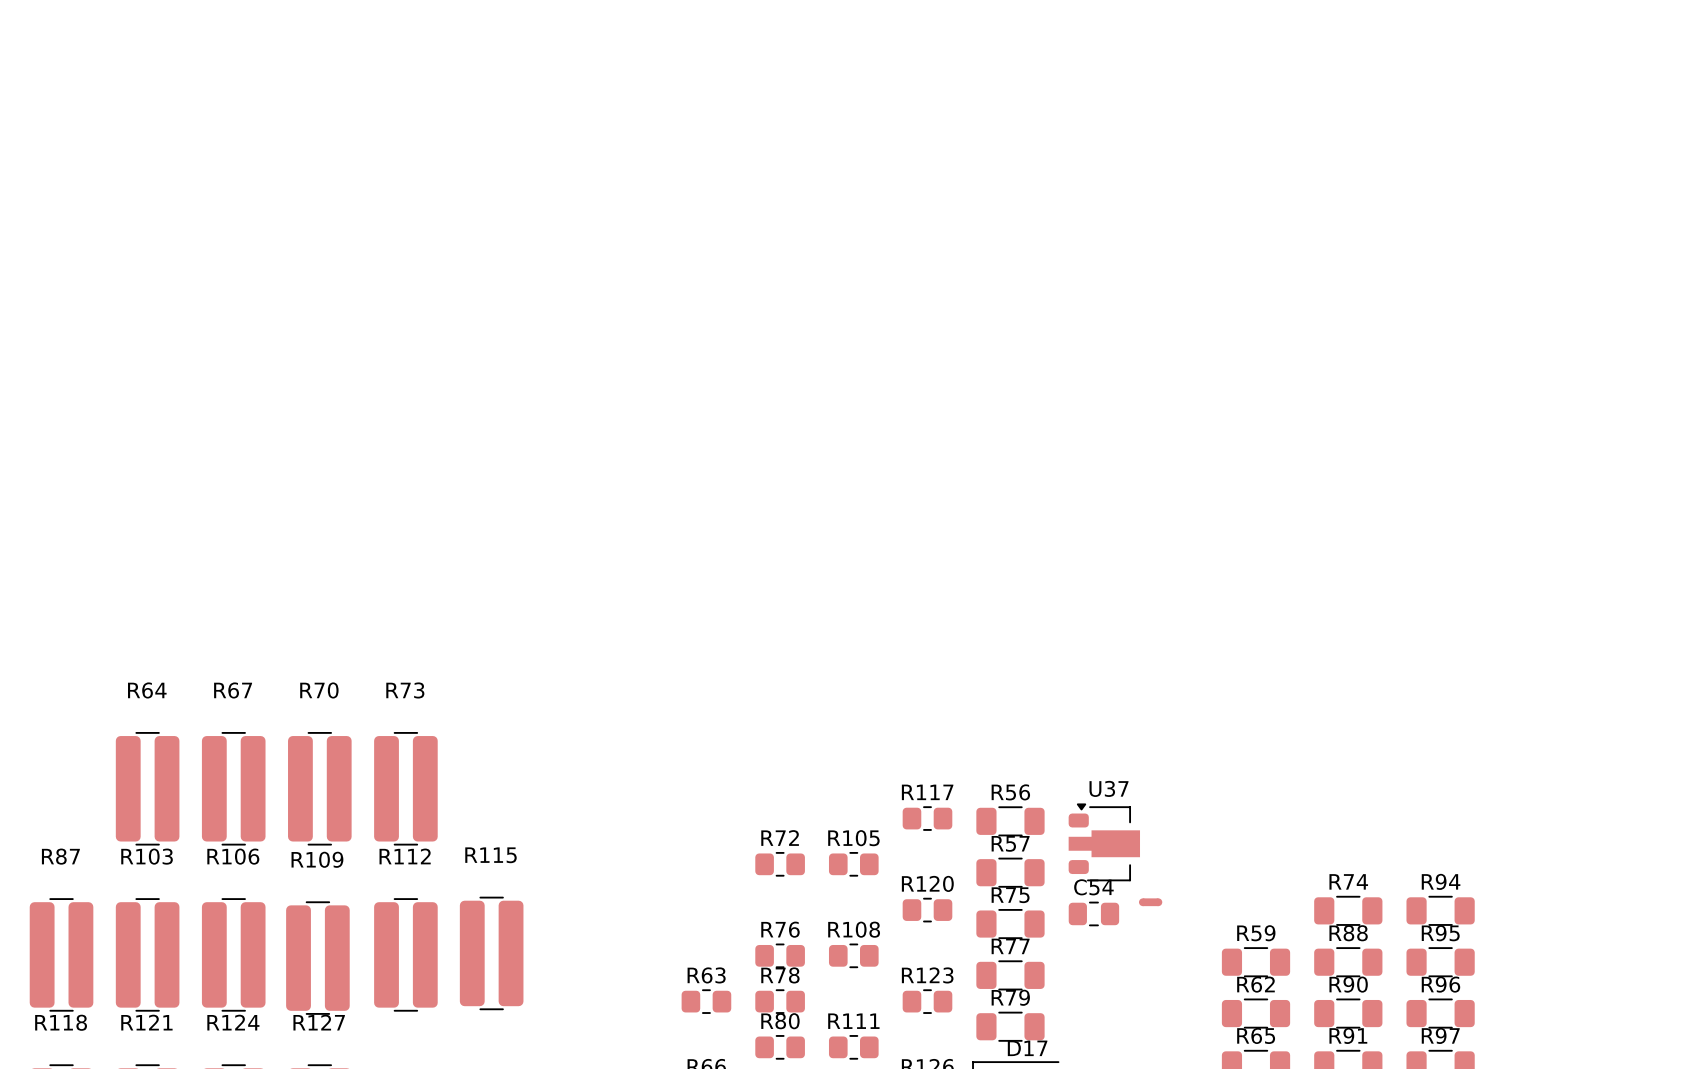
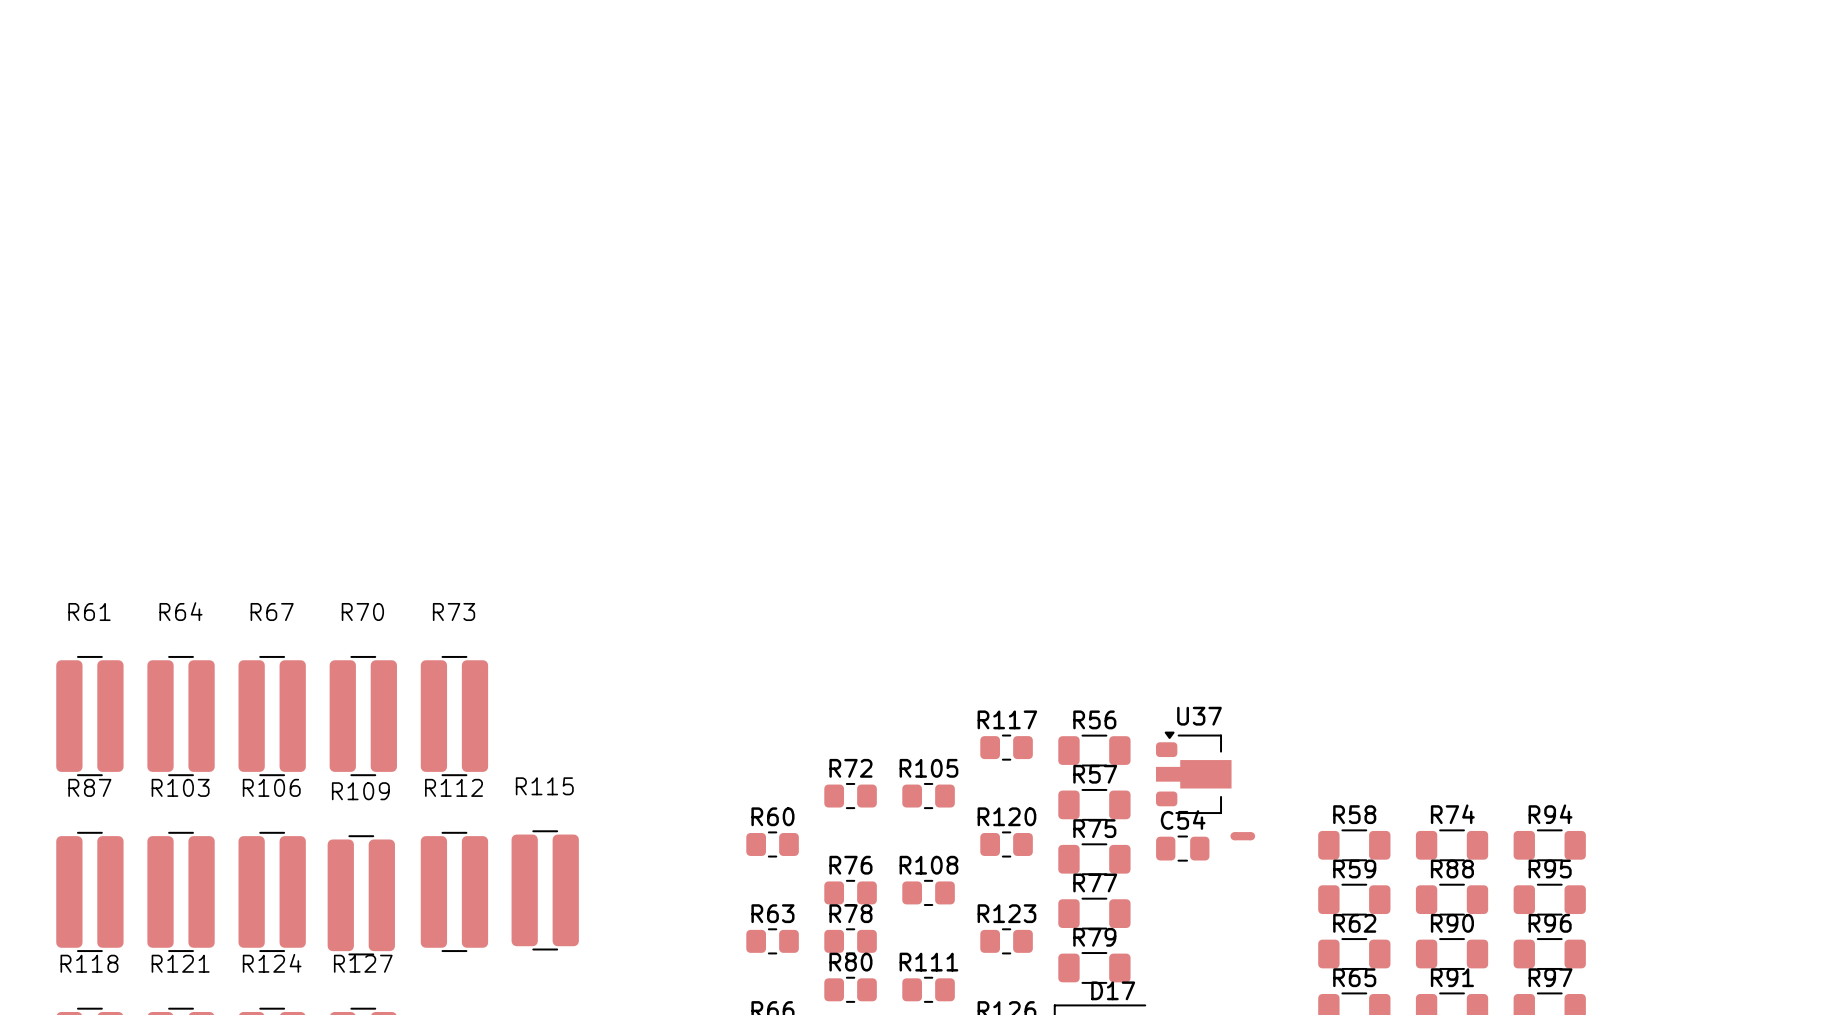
R61: none -> (89, 716)
R60: none -> (772, 844)
R58: none -> (1354, 845)

